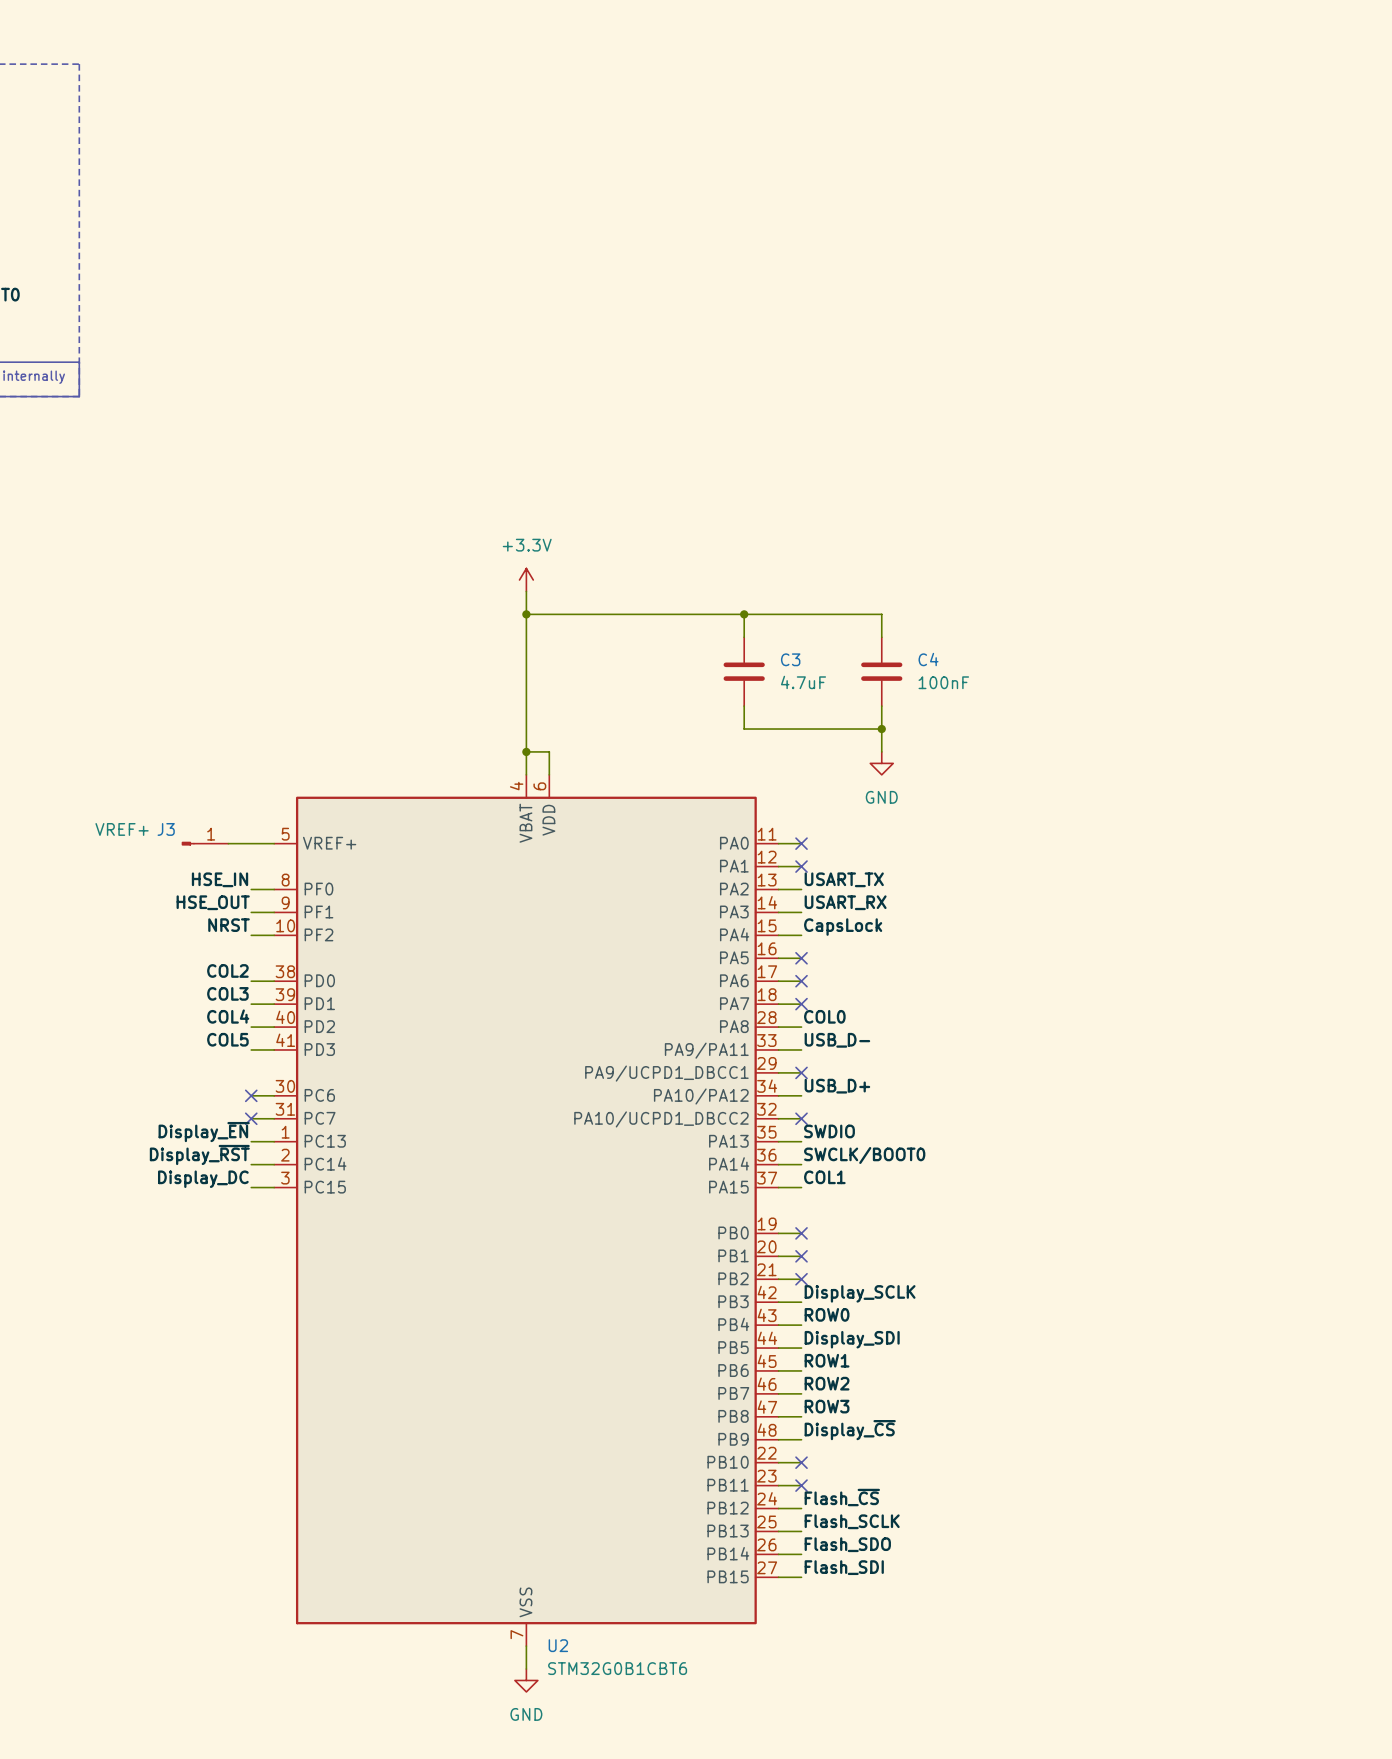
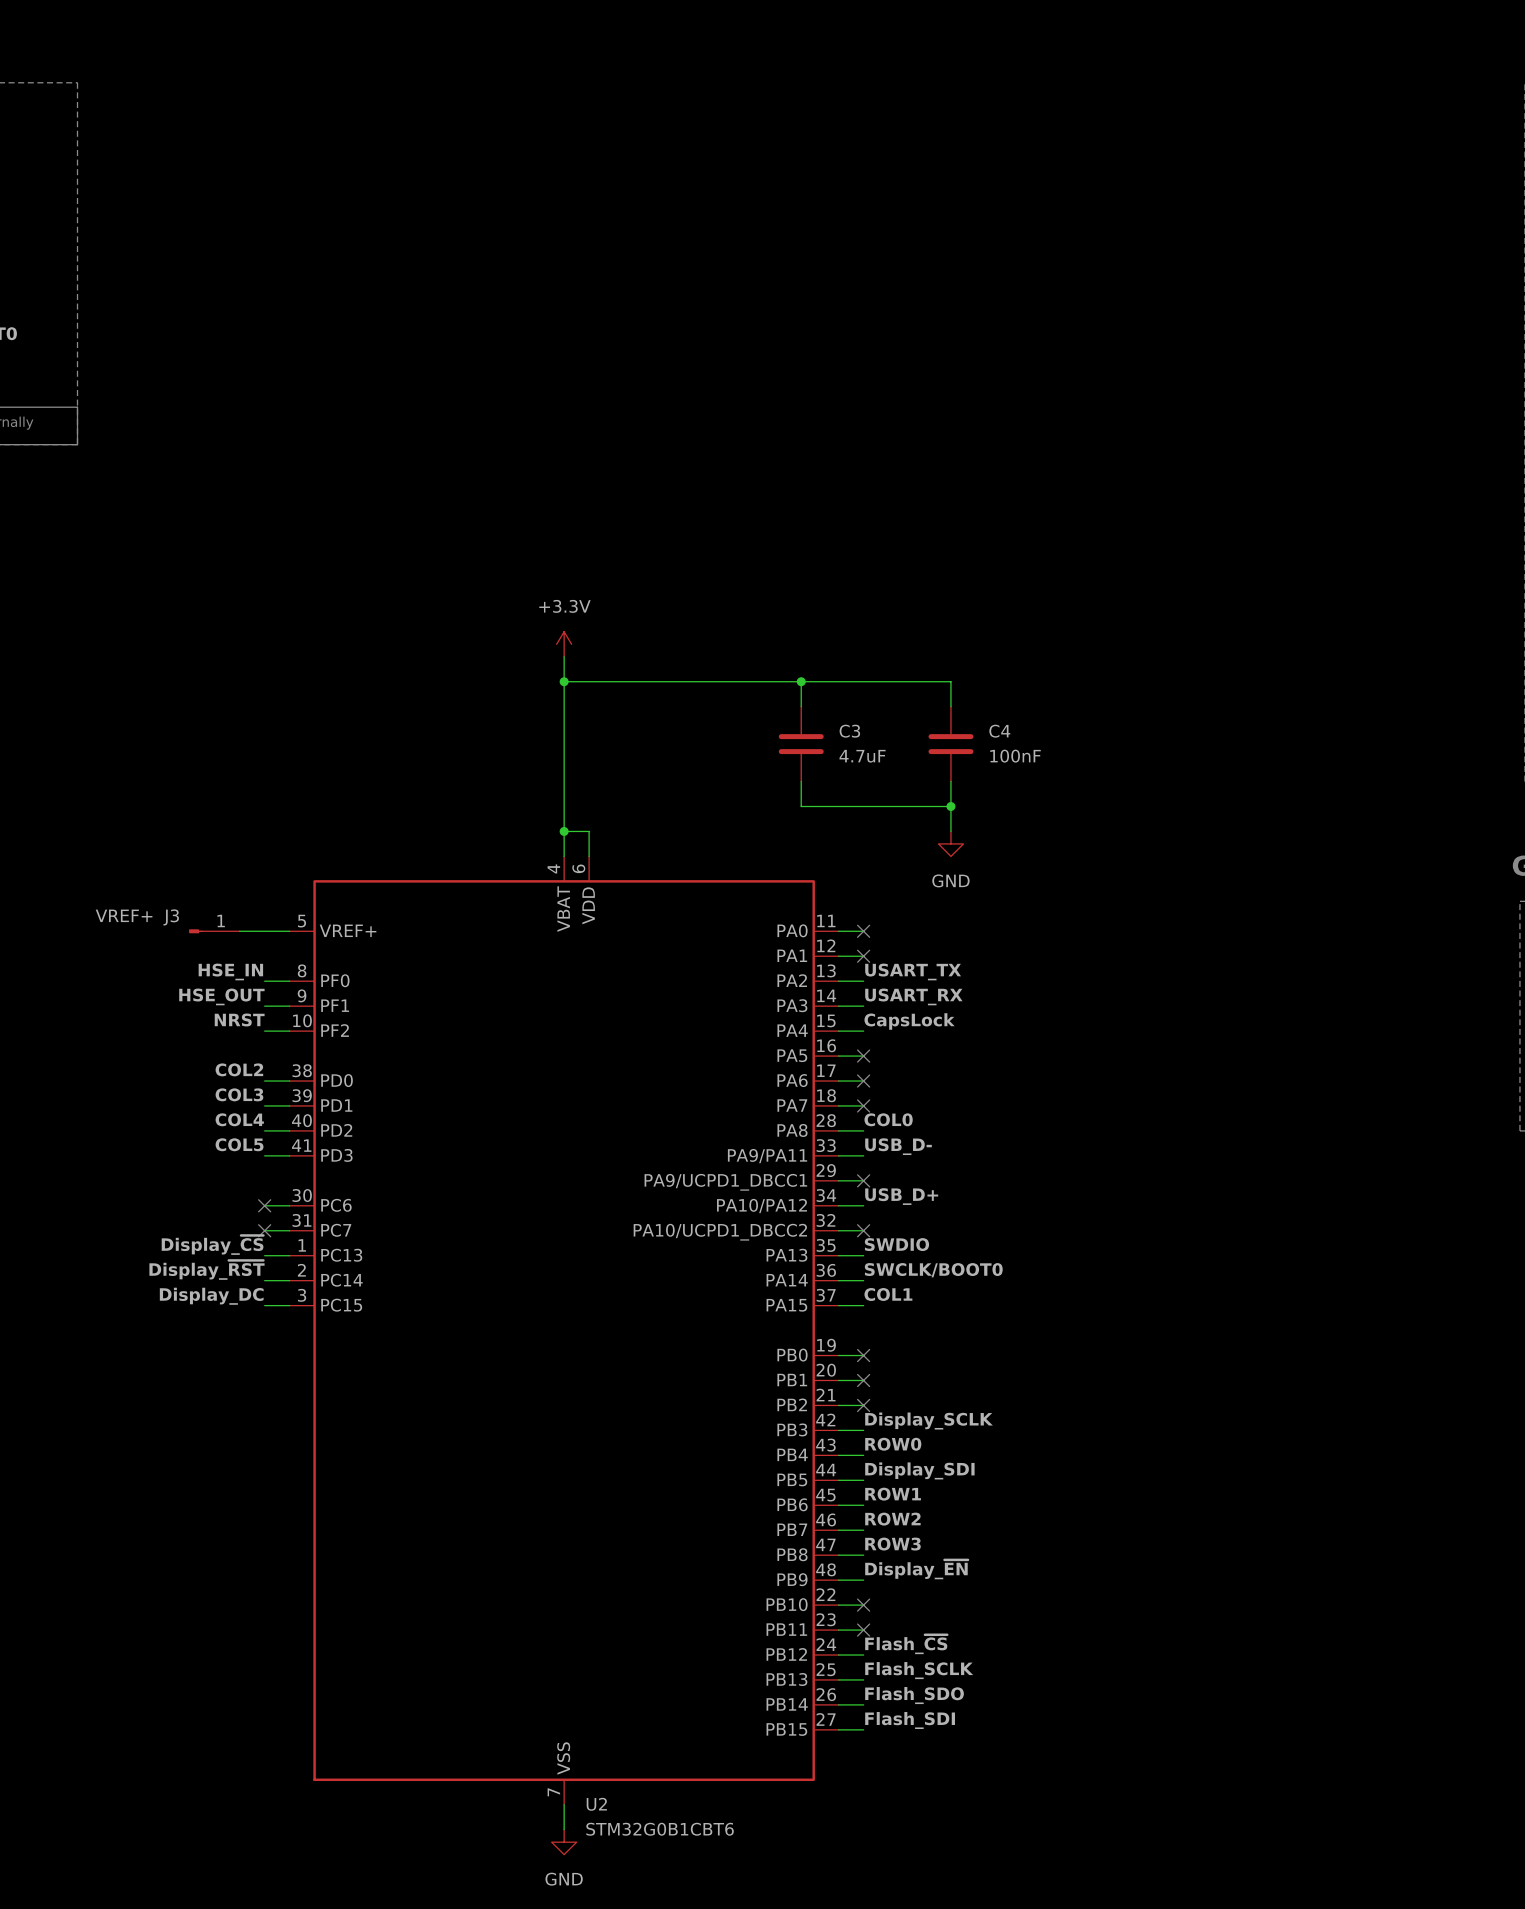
label: Display_~{EN} (204, 1132) -> Display_~{CS} (212, 1245)
label: Display_~{CS} (850, 1430) -> Display_~{EN} (916, 1569)

